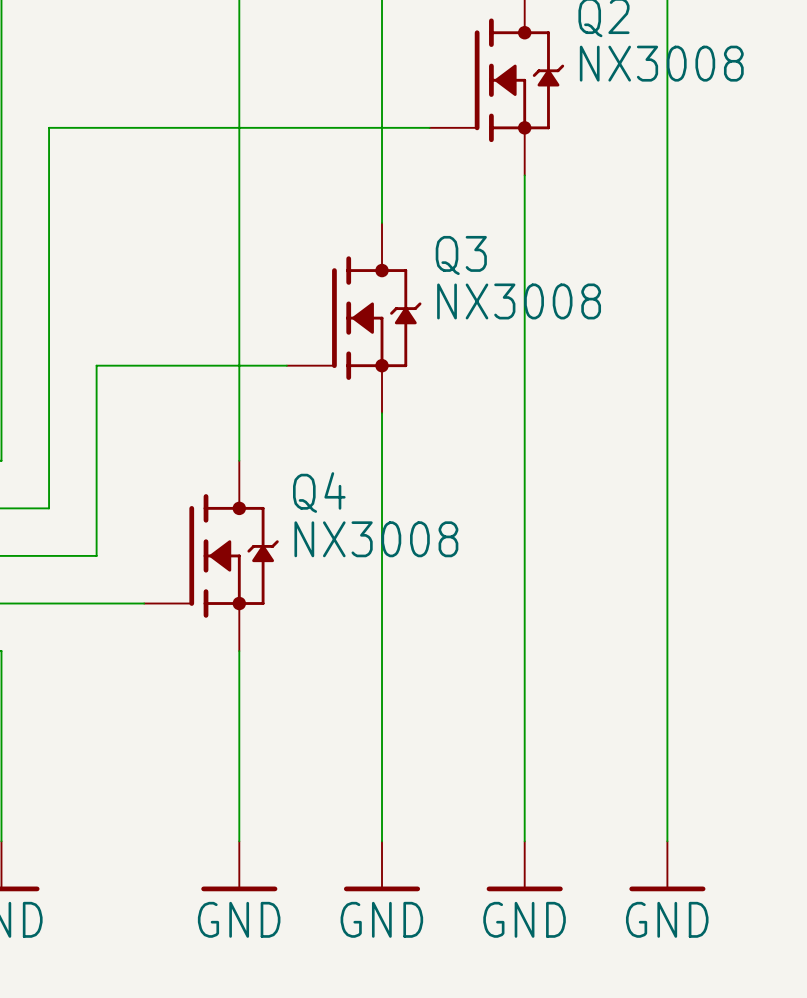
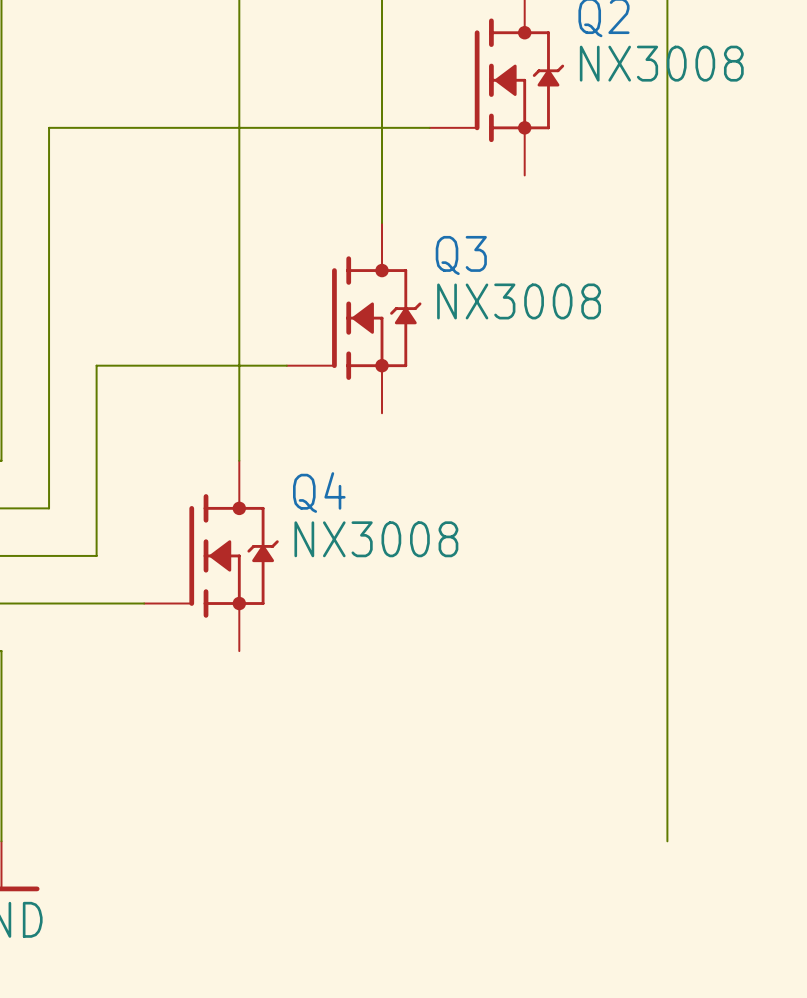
wire: (524, 175) (524, 841) -> none
wire: (382, 413) (382, 841) -> none
wire: (239, 651) (239, 841) -> none
power symbol: GND (239, 866) -> none
power symbol: GND (382, 866) -> none
power symbol: GND (524, 866) -> none
power symbol: GND (667, 866) -> none

